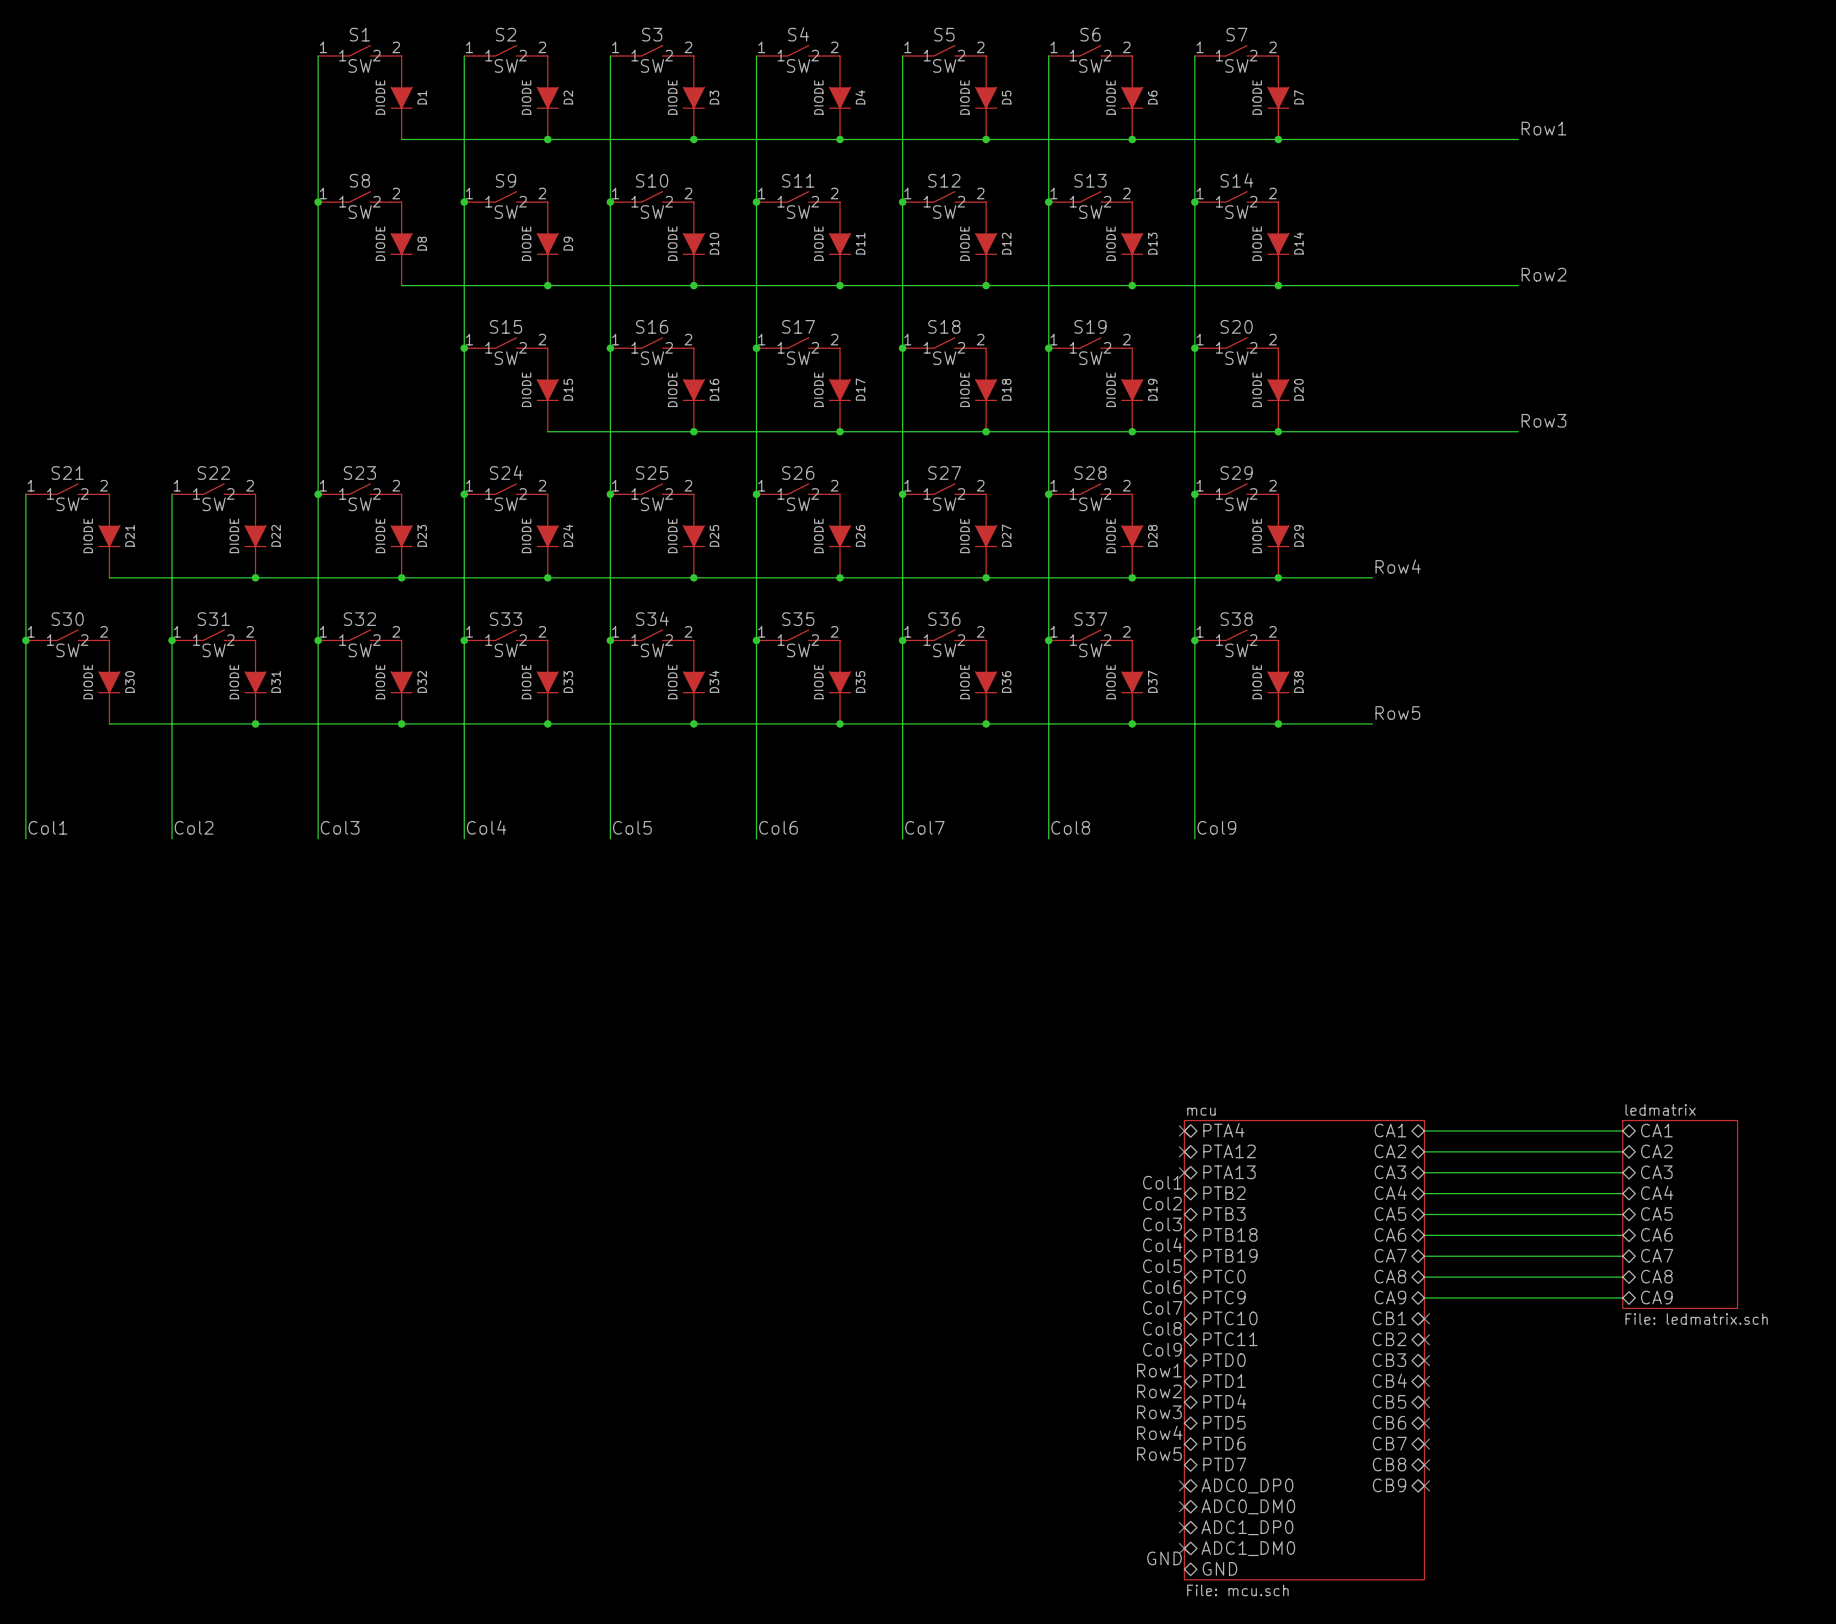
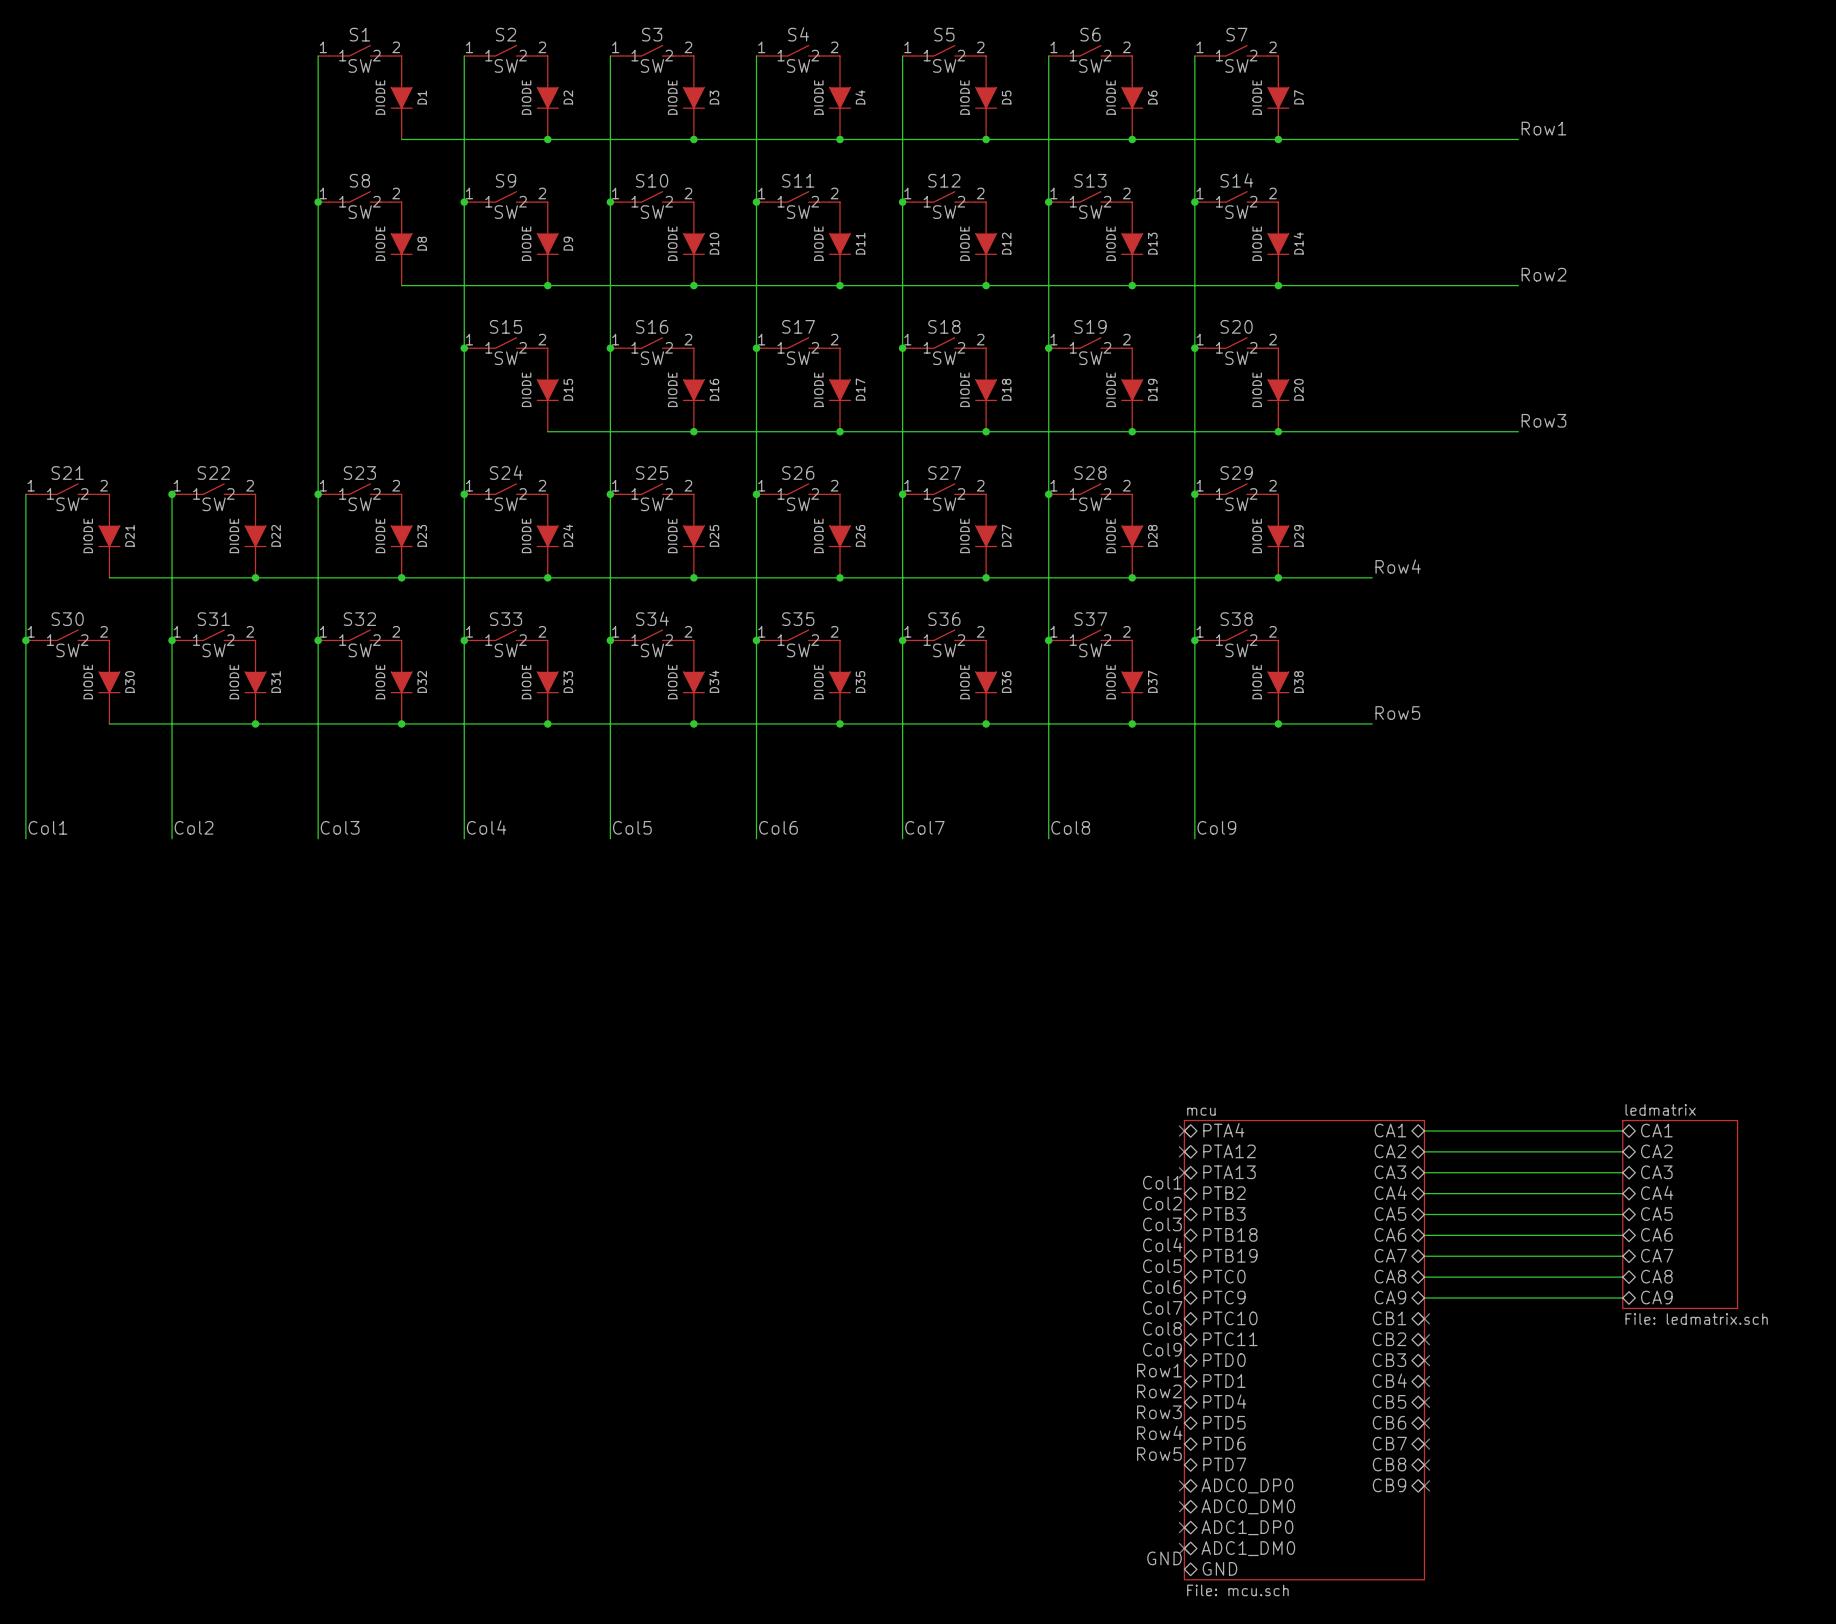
junction: none -> (172, 494)

